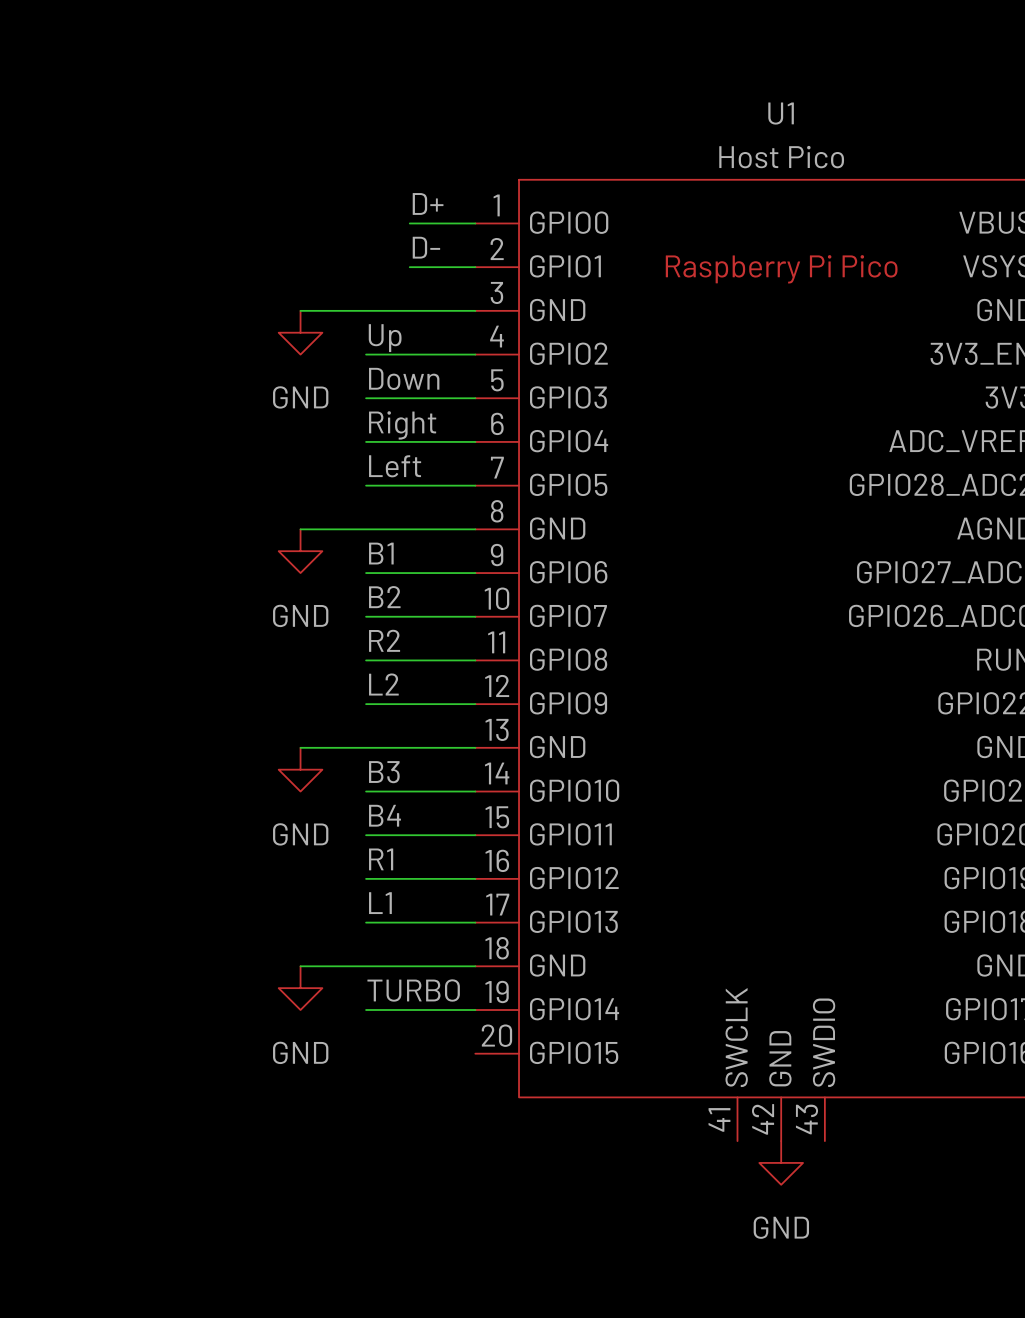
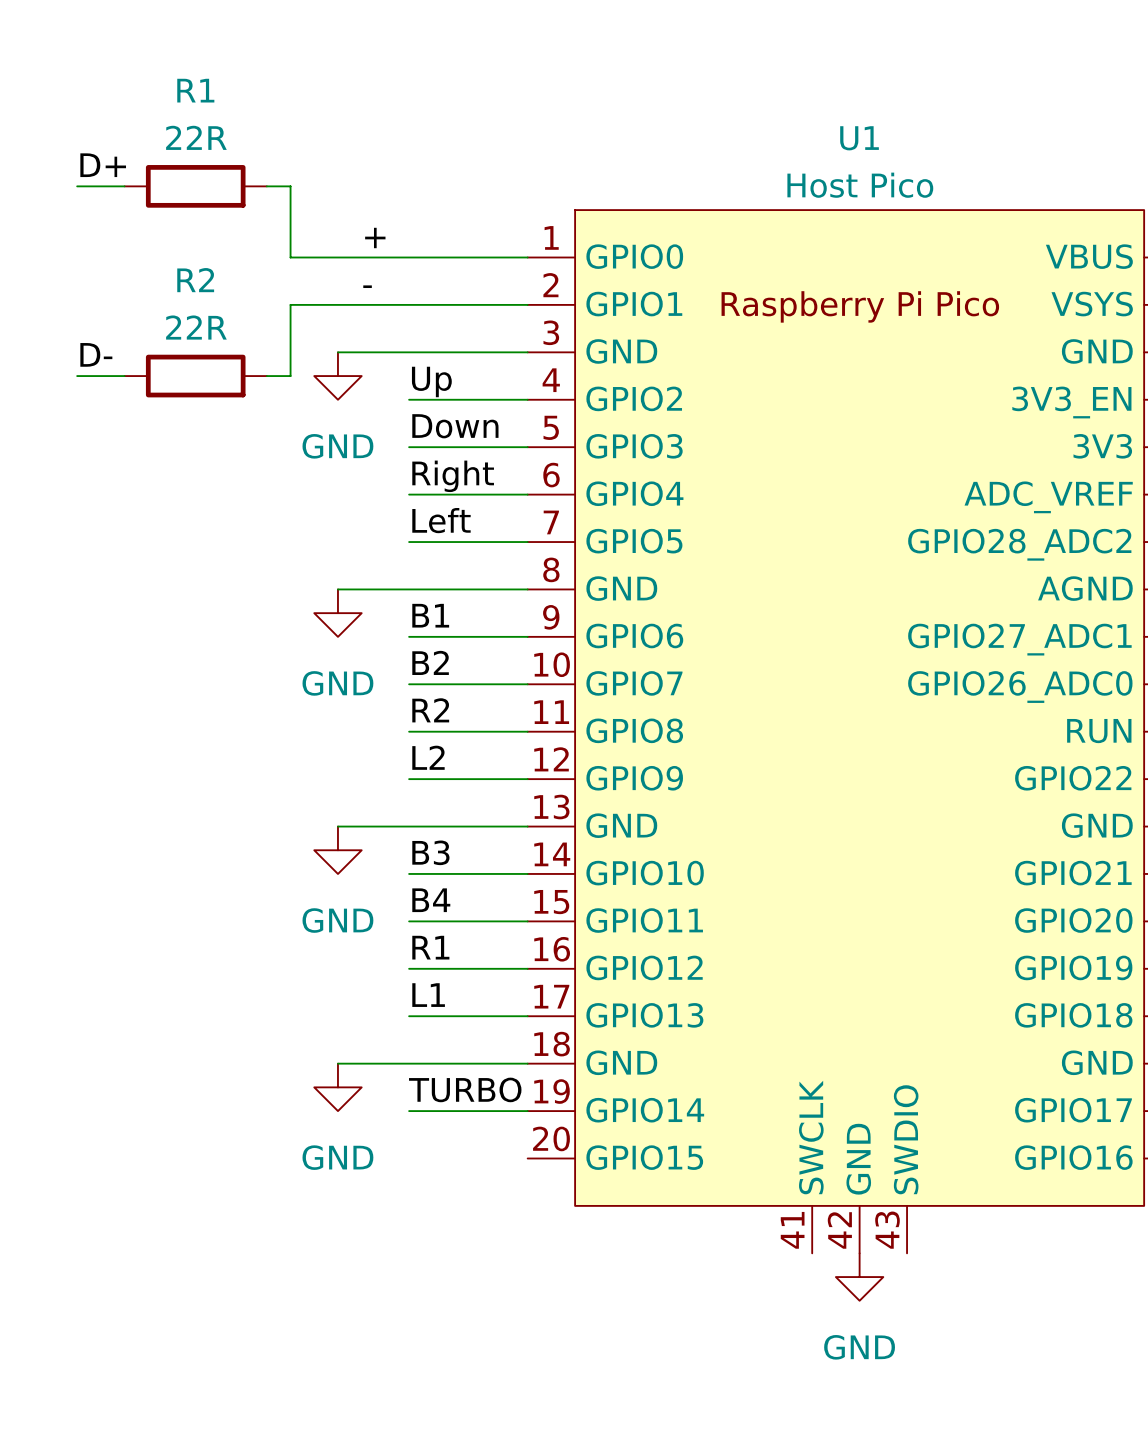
wire: none -> (77, 186) (124, 186)
R1: none -> 22R (195, 186)
wire: none -> (266, 186) (290, 186) (290, 257) (456, 257)
label position: D+ (428, 203) -> D+ (103, 165)
label: none -> + (375, 237)
label position: D- (426, 247) -> D- (96, 354)
label: none -> - (367, 286)
wire: none -> (456, 304) (290, 304) (290, 376) (266, 376)
wire: none -> (77, 376) (124, 376)
R2: none -> 22R (195, 376)

